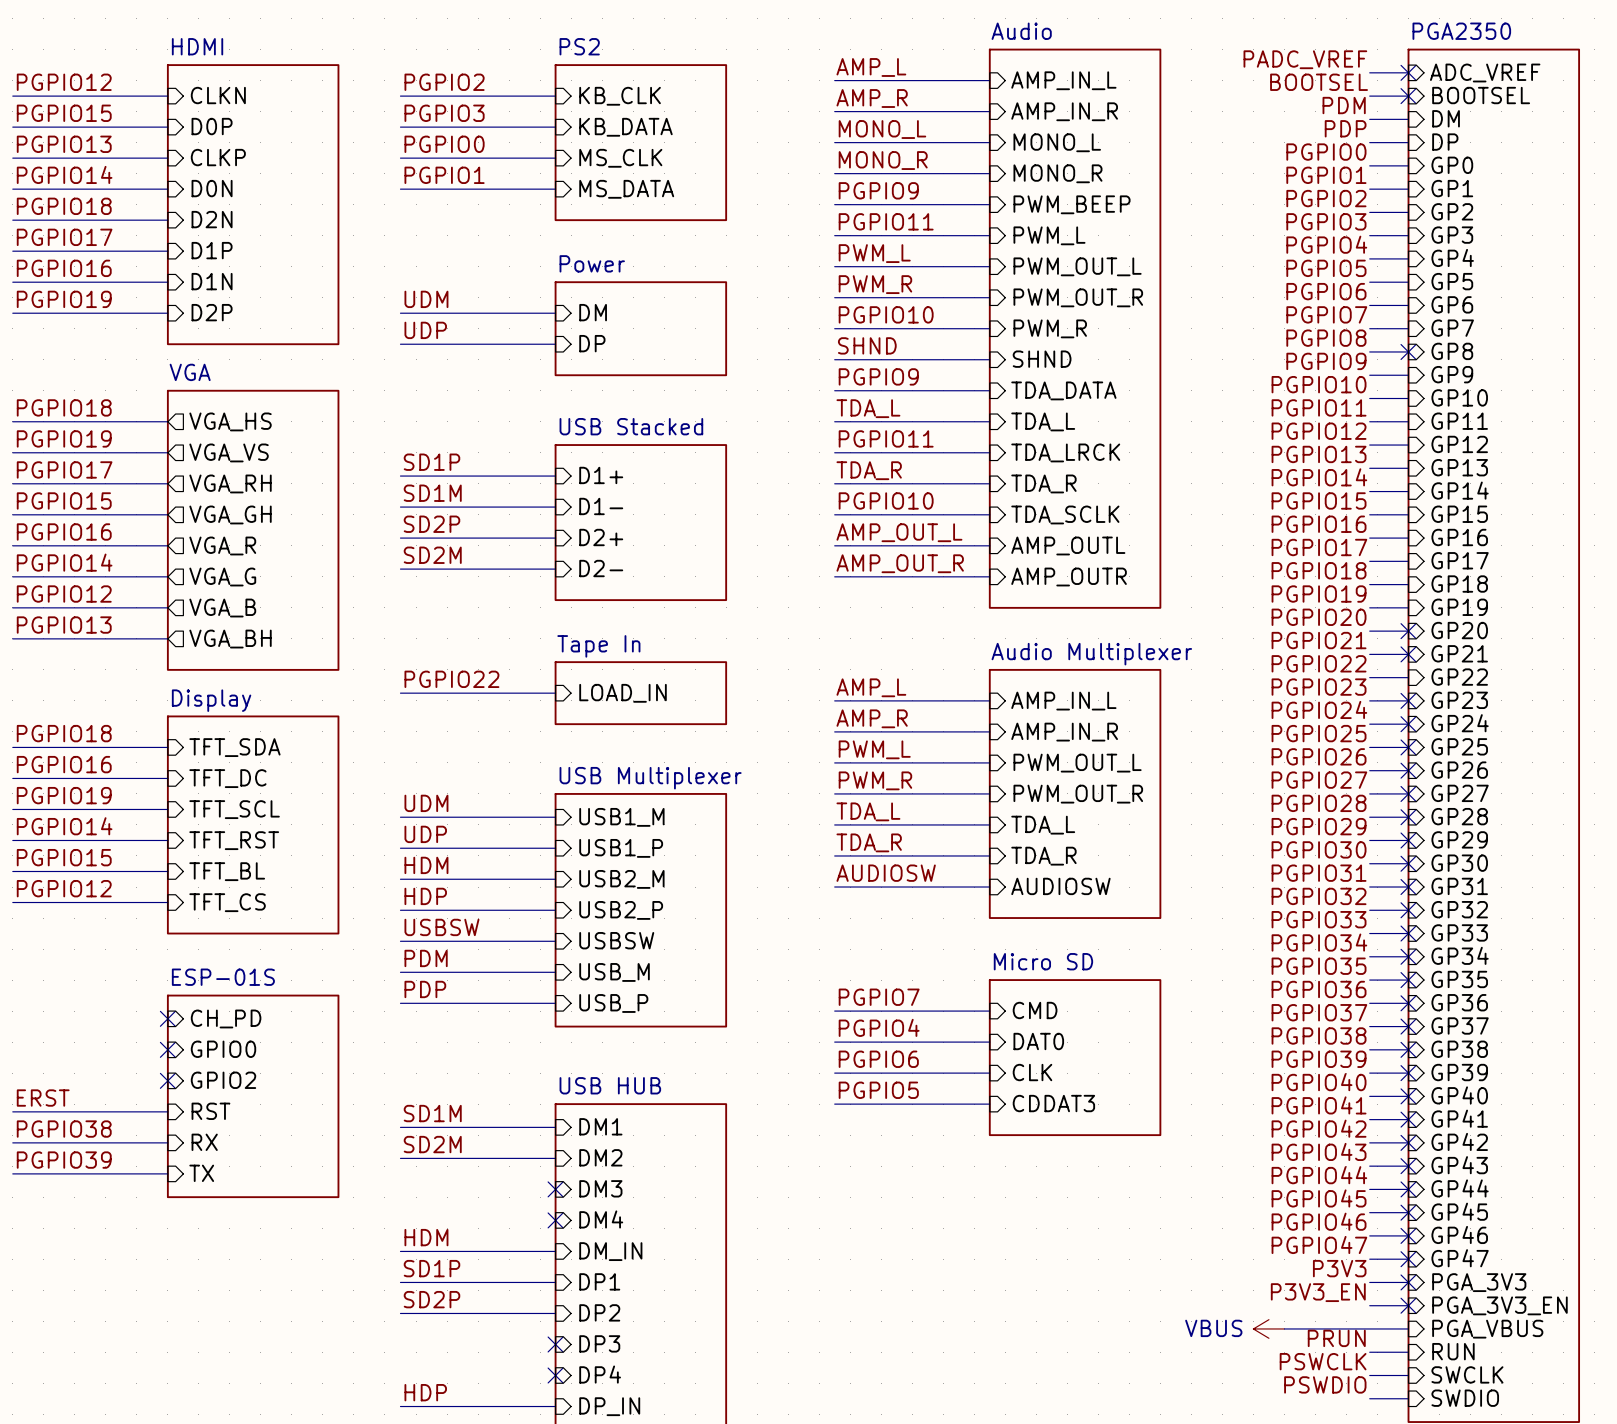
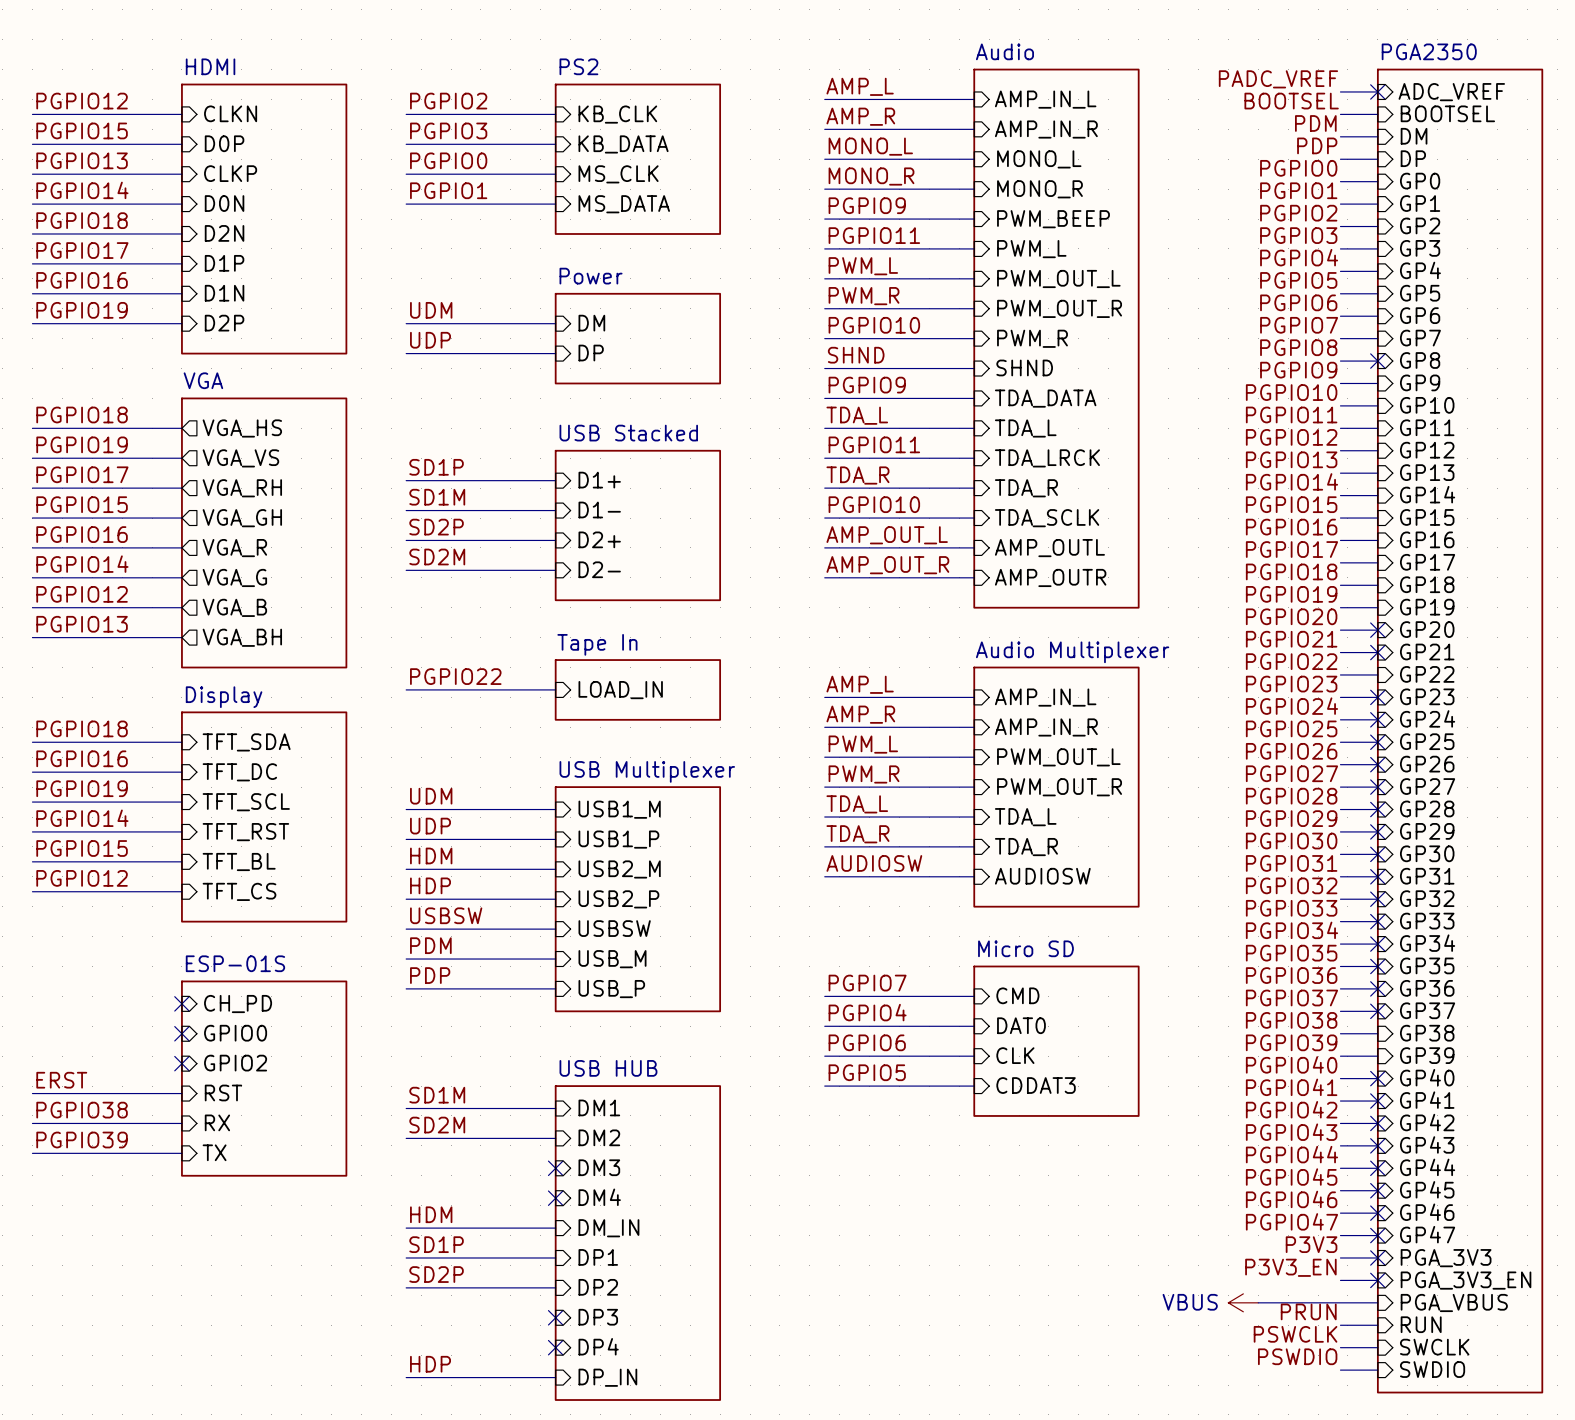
no-connect mark: (1408, 96) -> none
no-connect mark: (1408, 1049) -> none
no-connect mark: (1408, 1073) -> none

